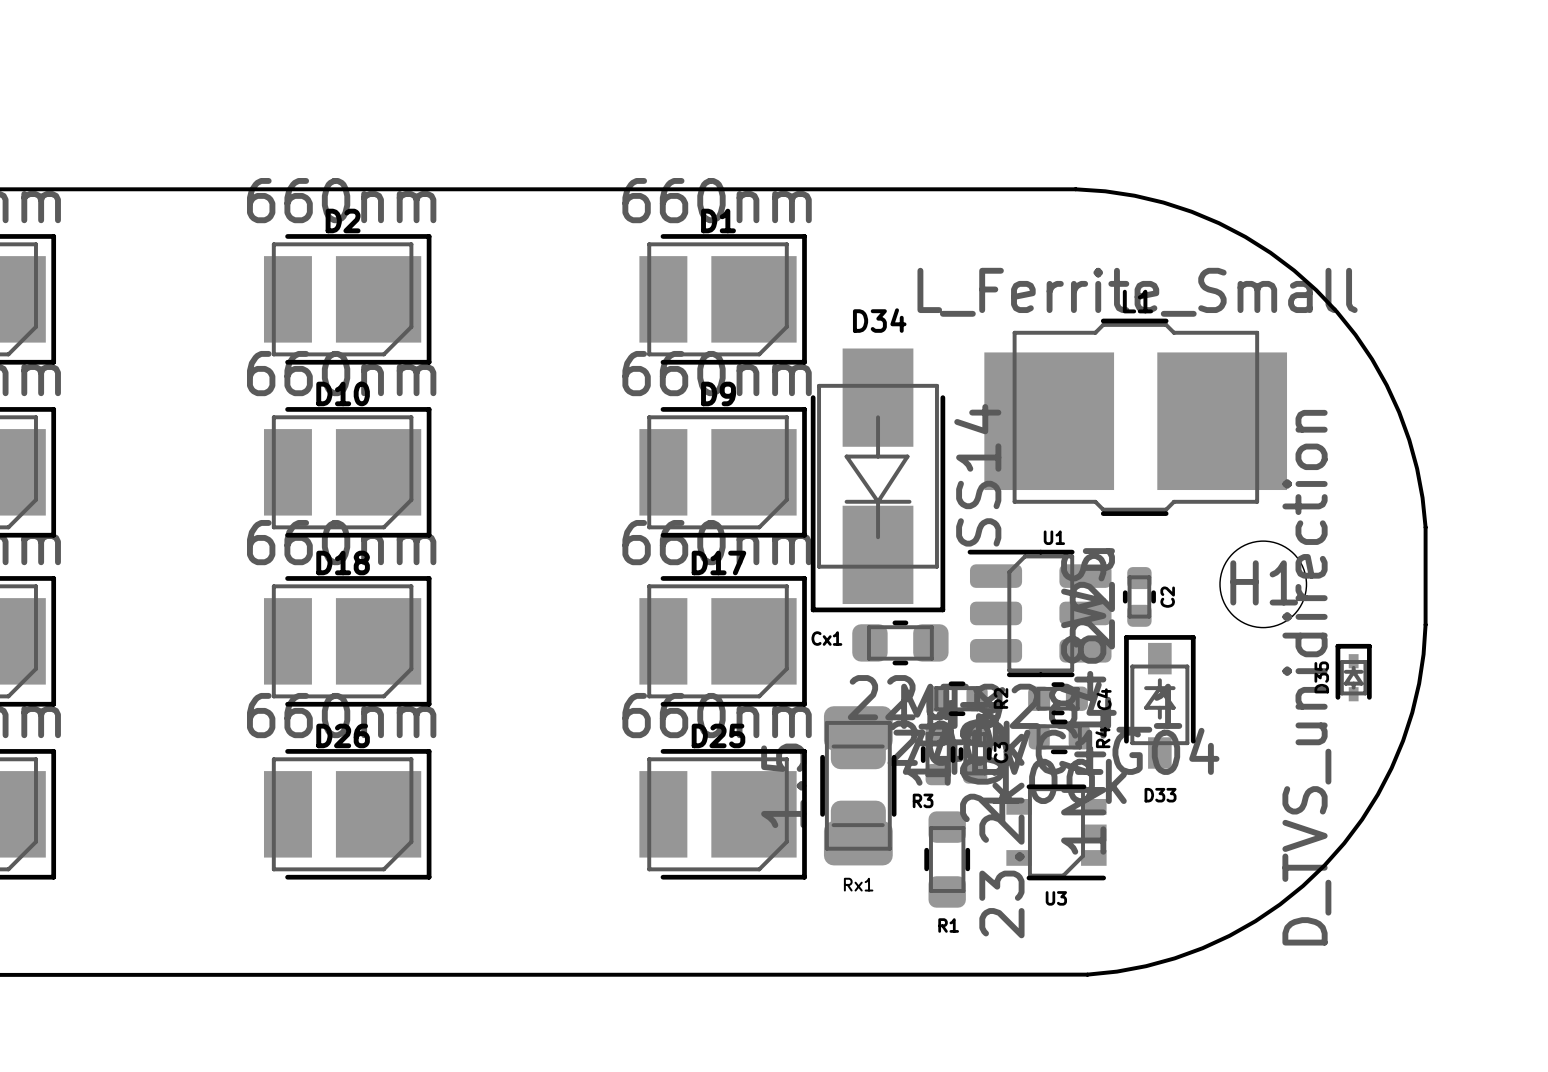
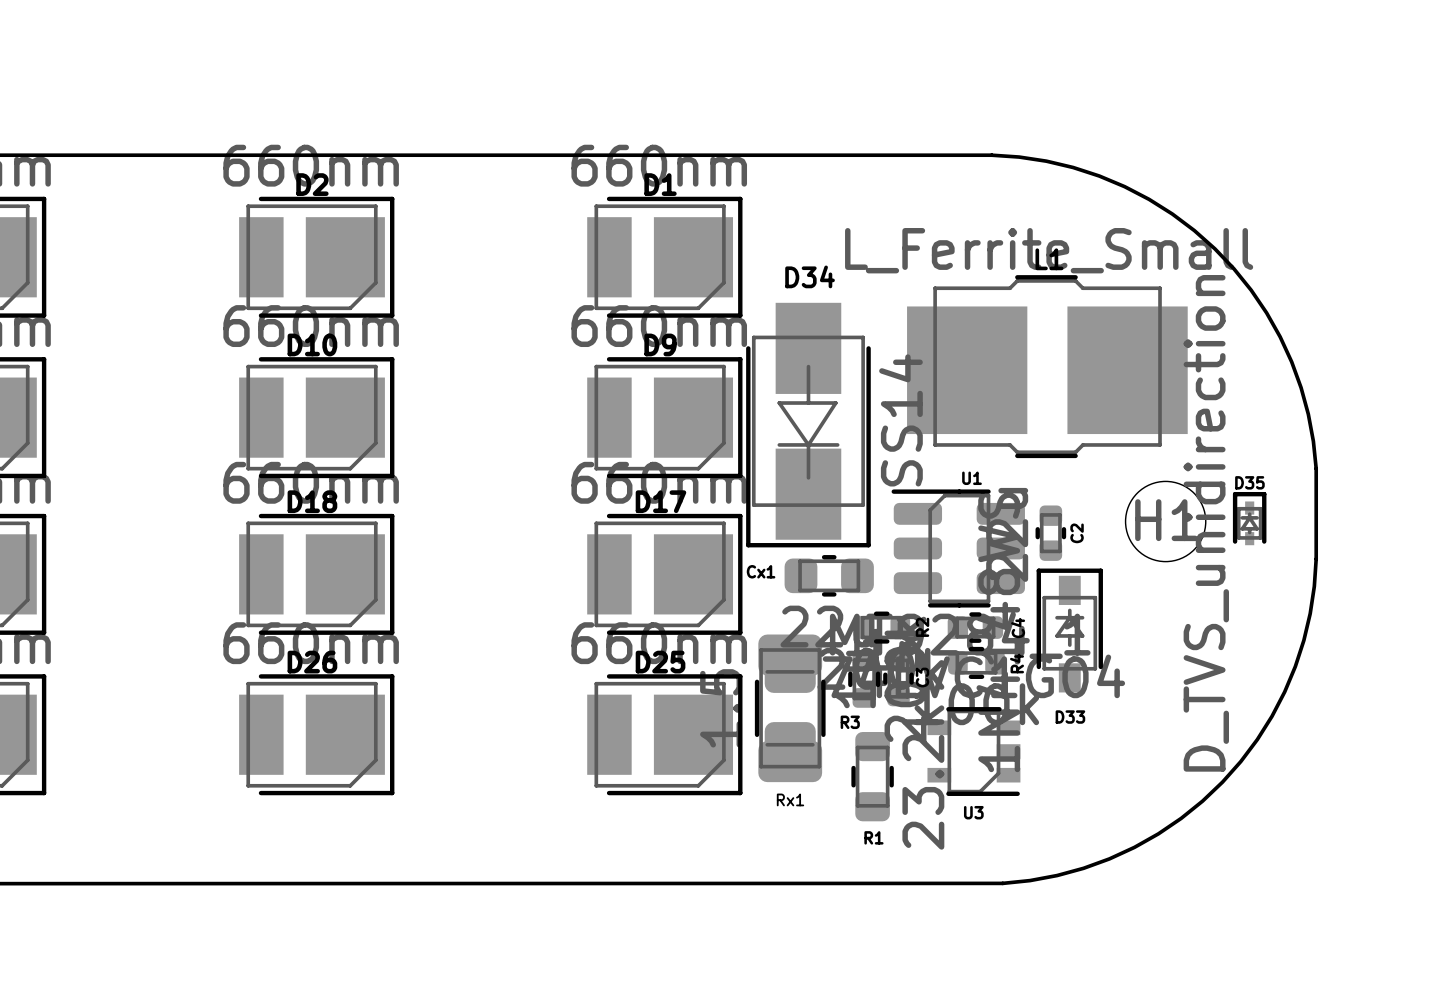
D35 position: (1353, 672) -> (1249, 518)
D35 name rotation: 0° (1321, 677) -> 90° clockwise (1249, 482)
D35 name position: D35 (1321, 677) -> D35 (1249, 482)

